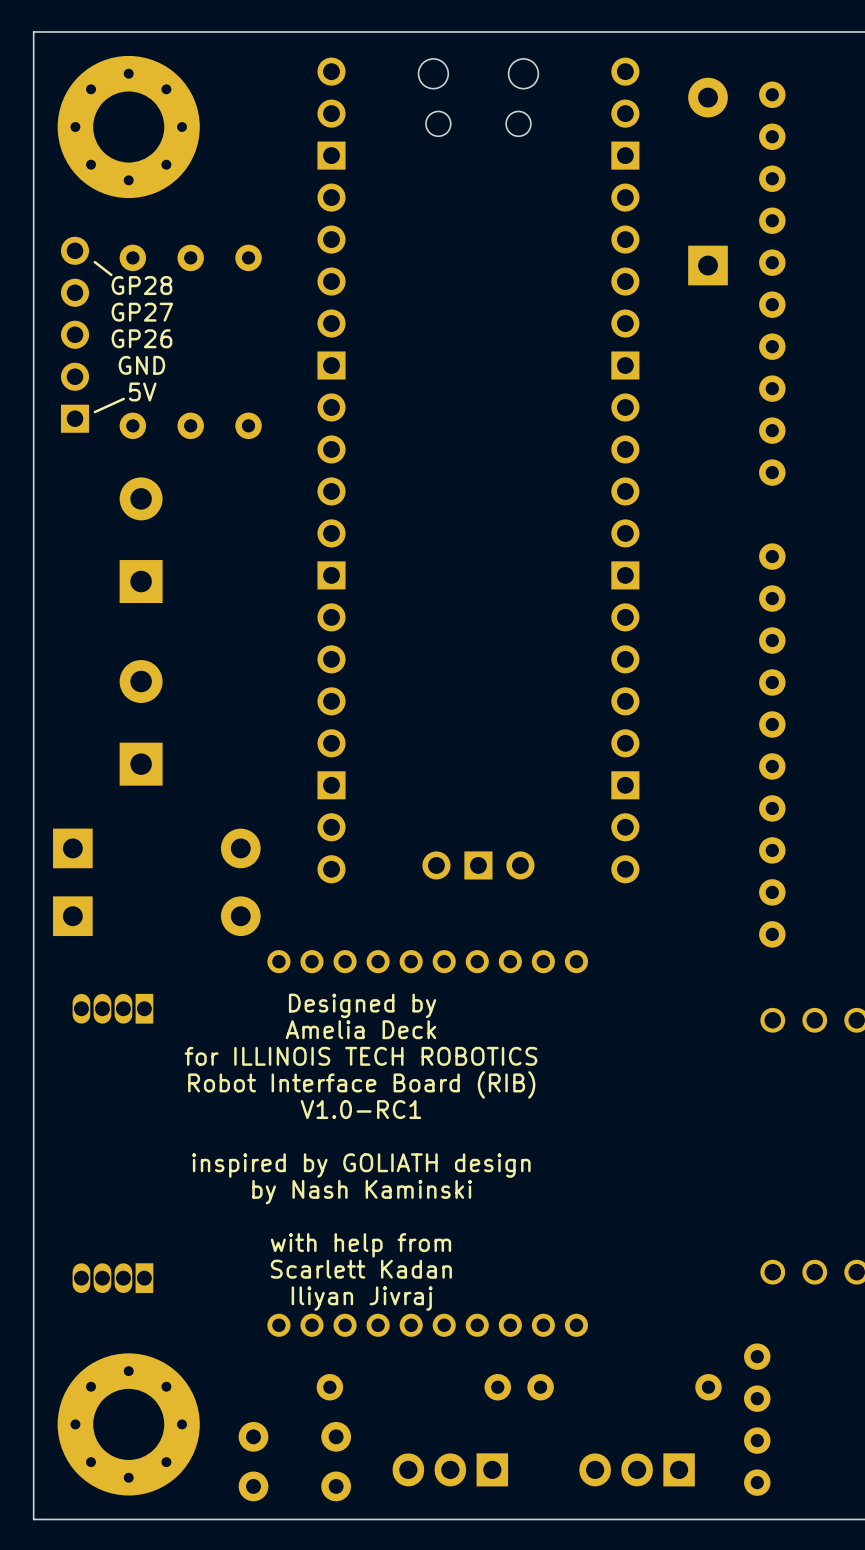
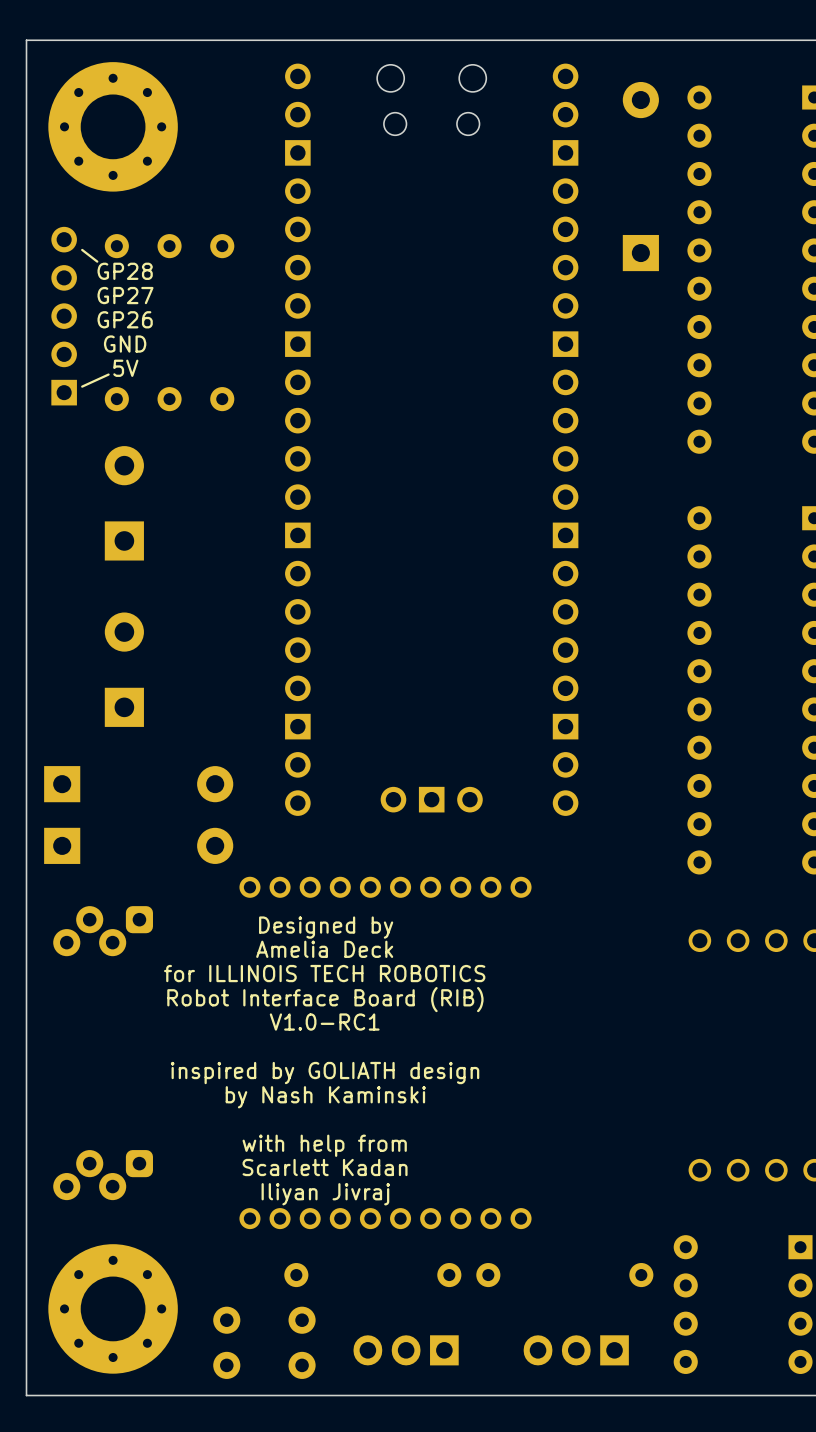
part footprint: [72, 993, 154, 1024] -> [53, 906, 153, 957]
part footprint: [72, 1263, 154, 1294] -> [53, 1150, 153, 1201]

